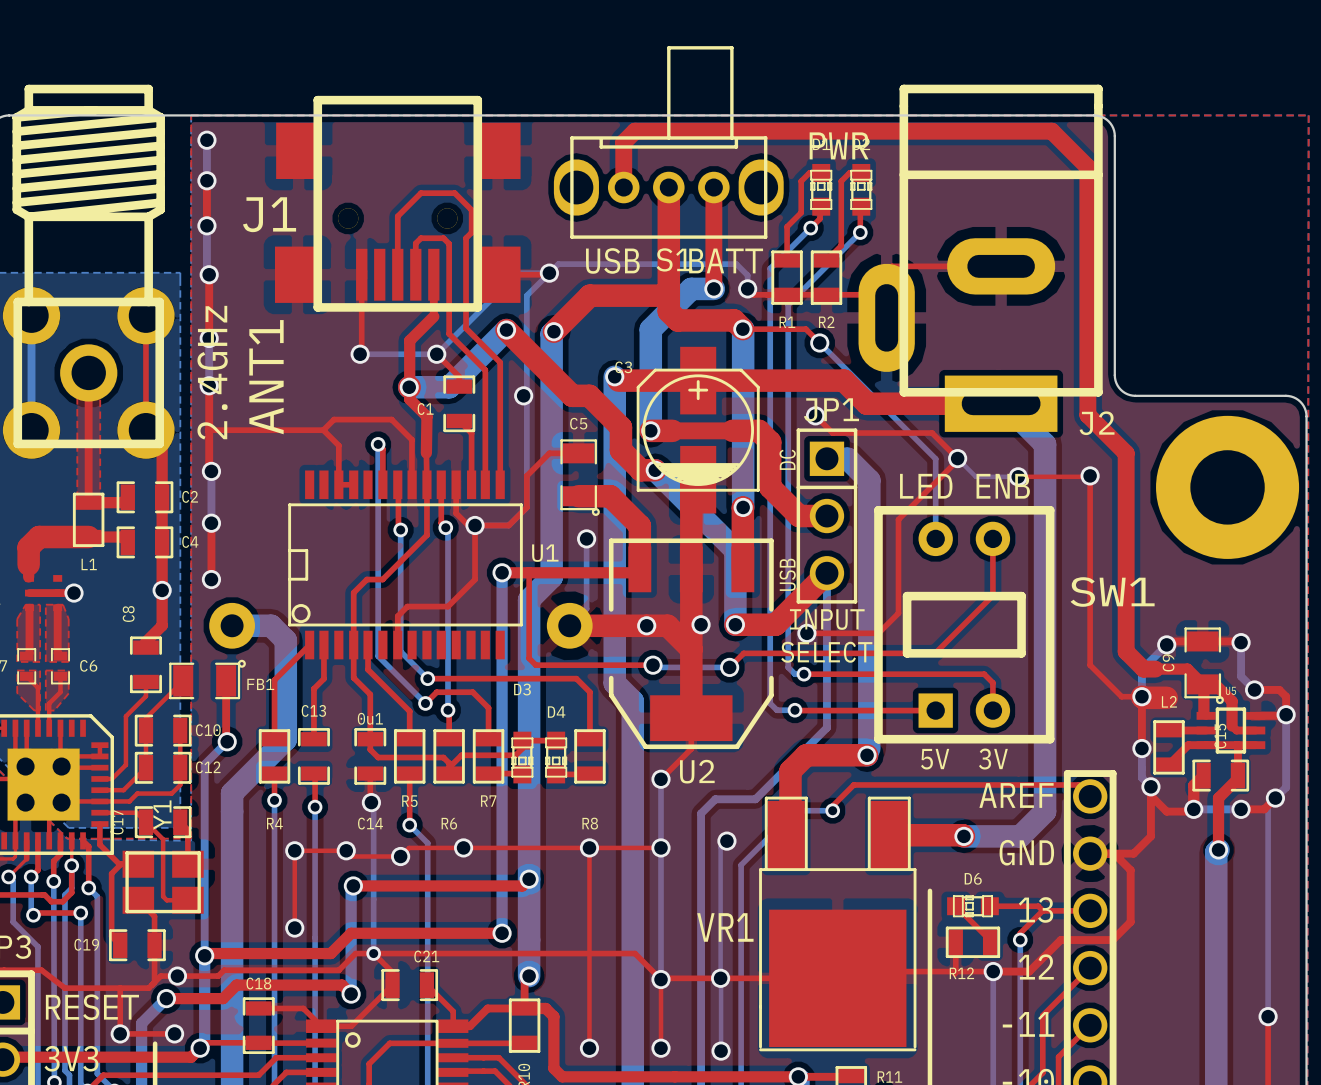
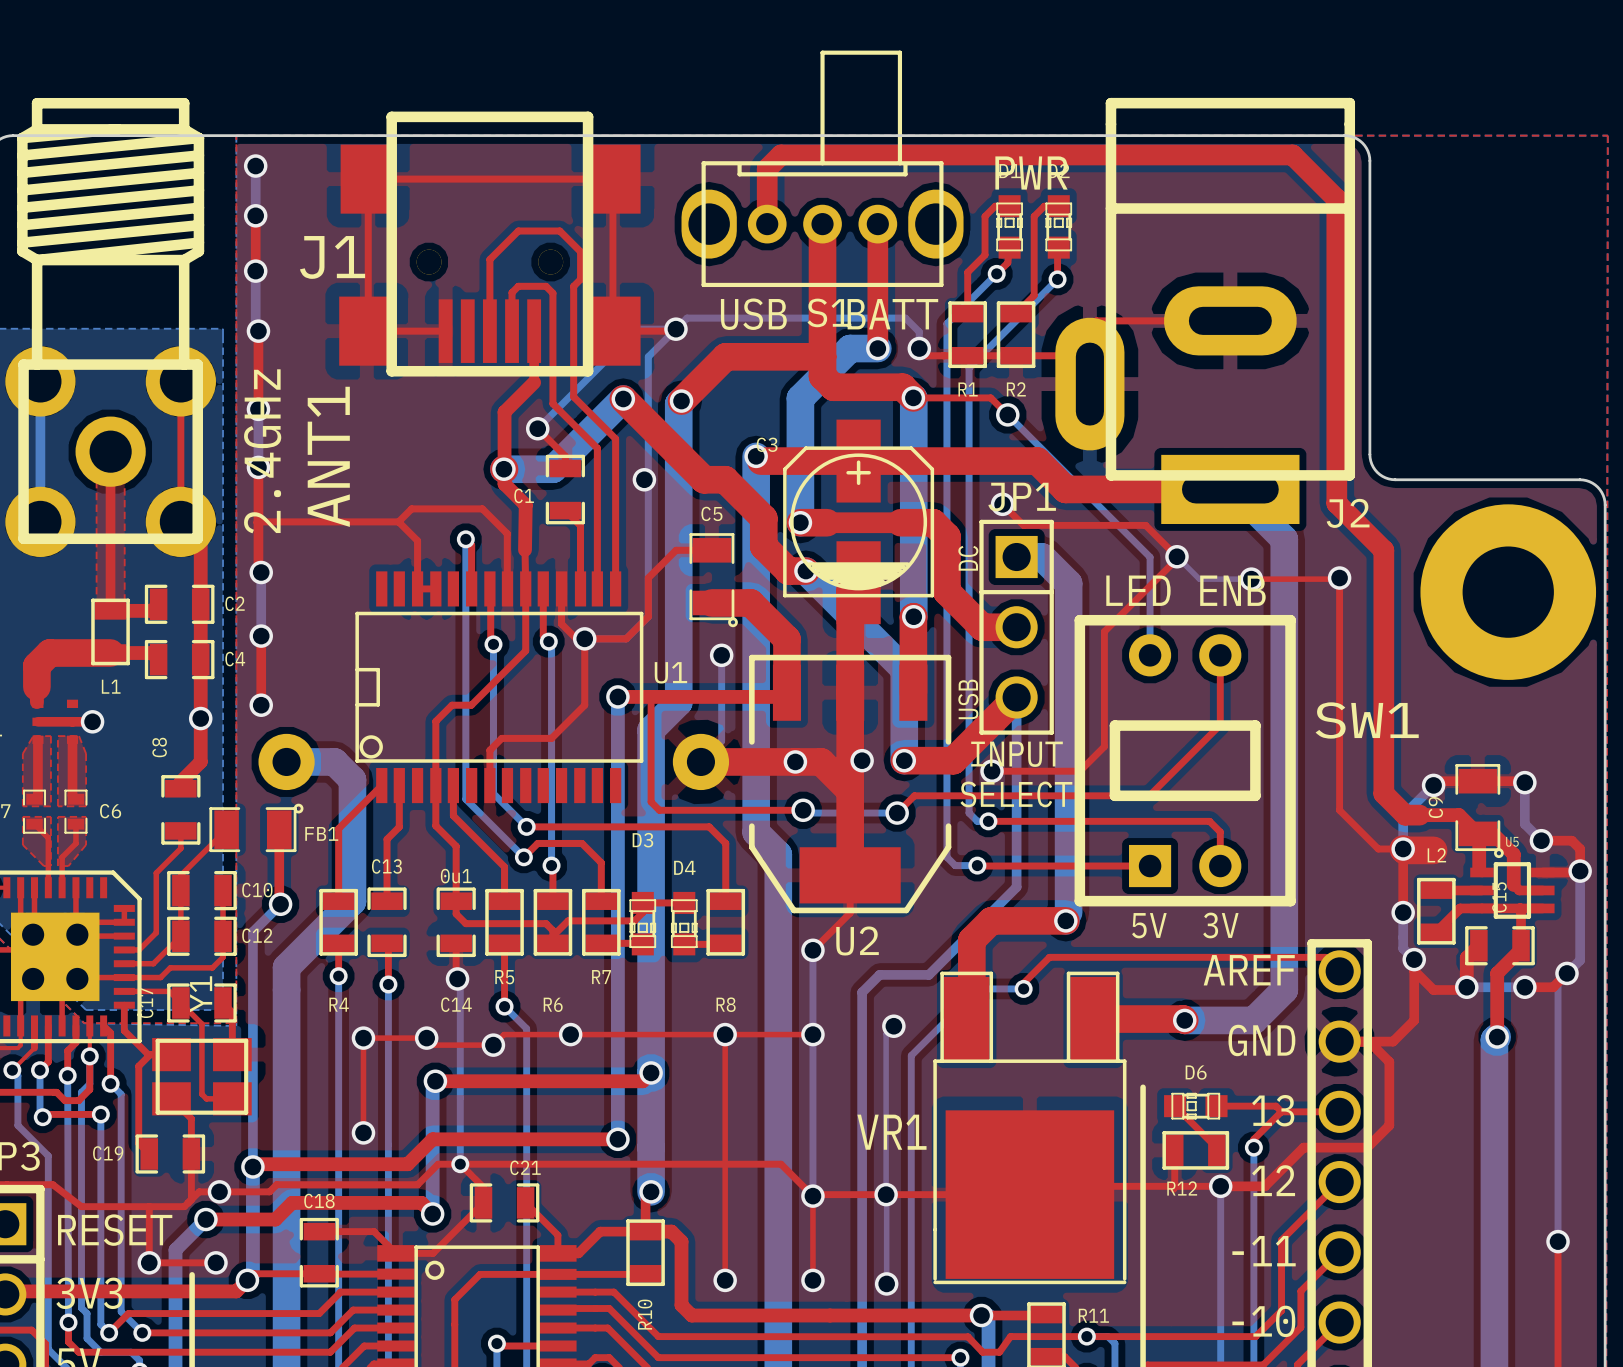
top track: none -> (368, 329) (368, 179) (612, 179) (612, 331)
top track: (361, 274) (361, 352) (360, 354) -> (445, 331) (366, 331)
bottom track: (360, 354) (436, 354) -> none
via: (360, 354) -> none

